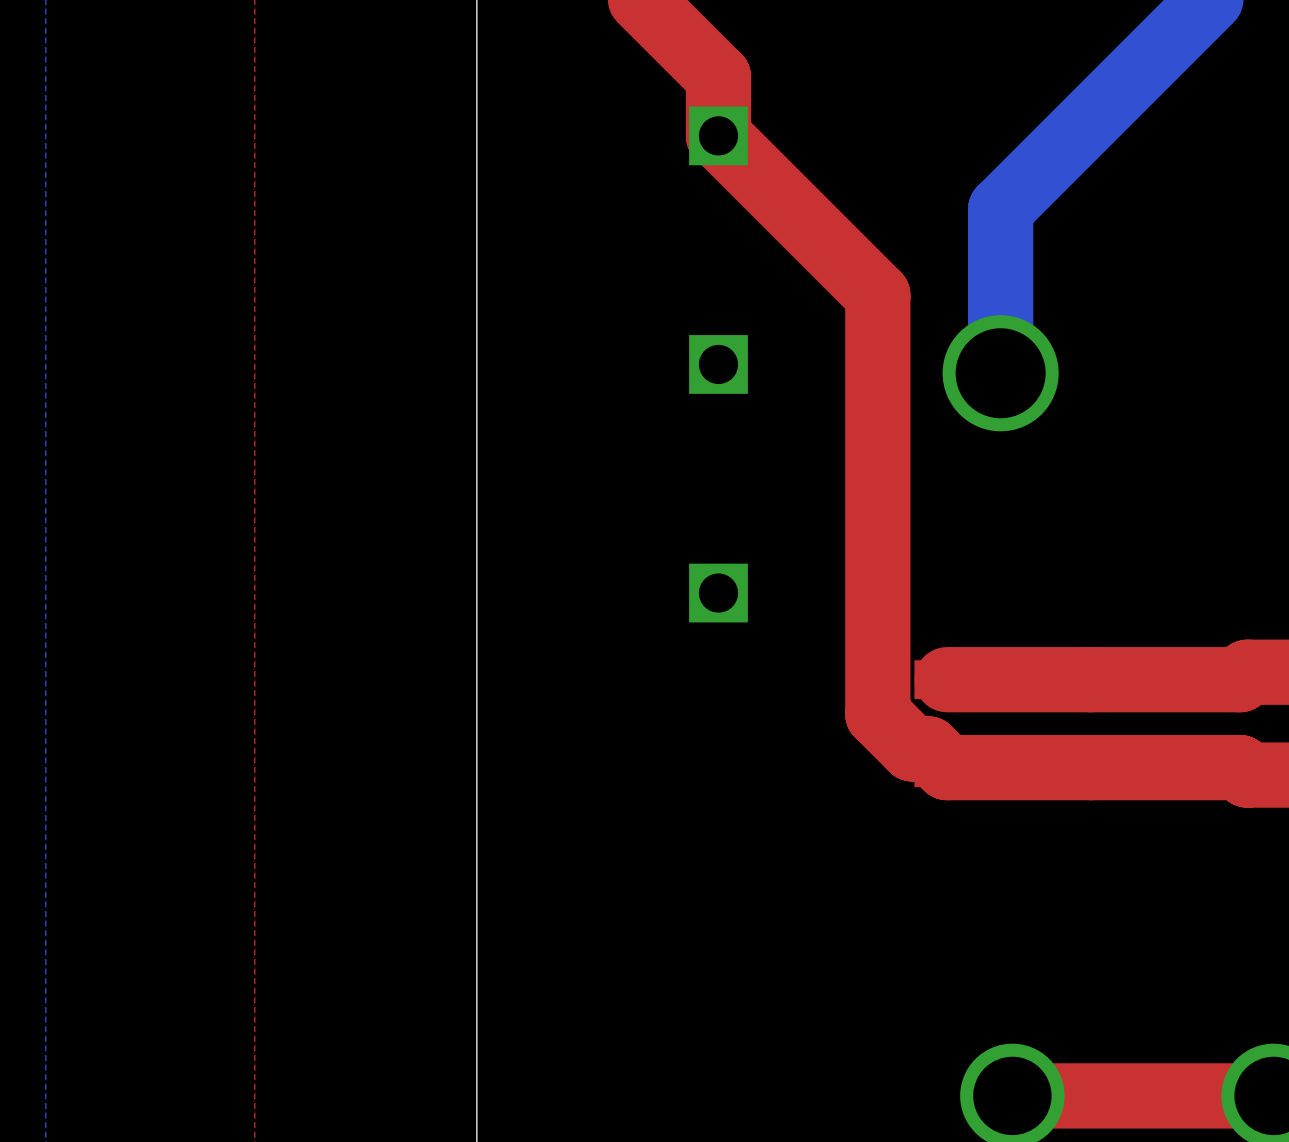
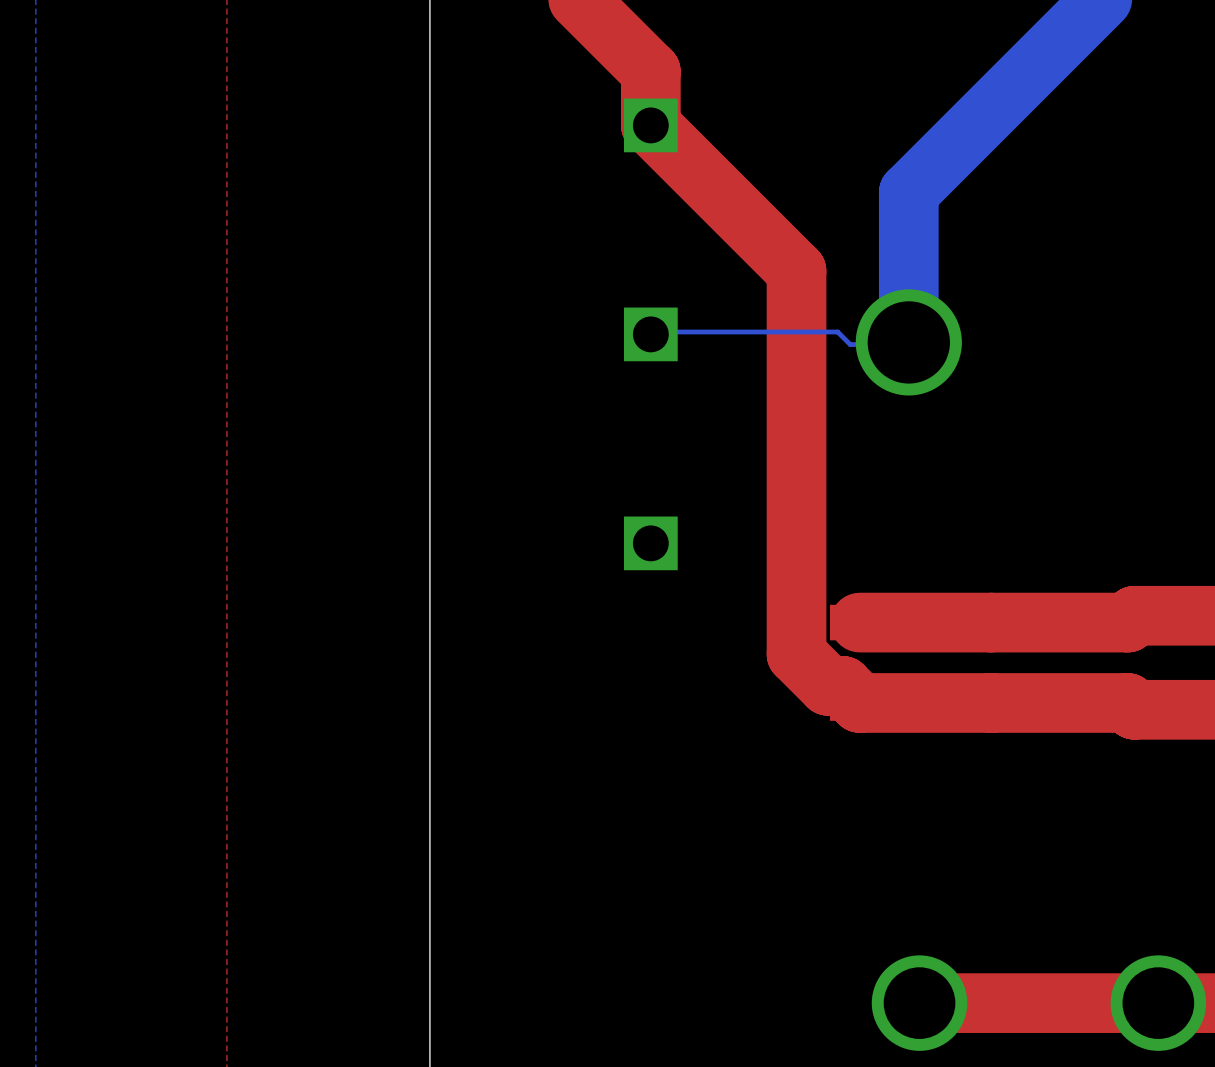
bottom track: none -> (650, 334) (653, 332) (837, 332) (850, 344) (908, 342)

